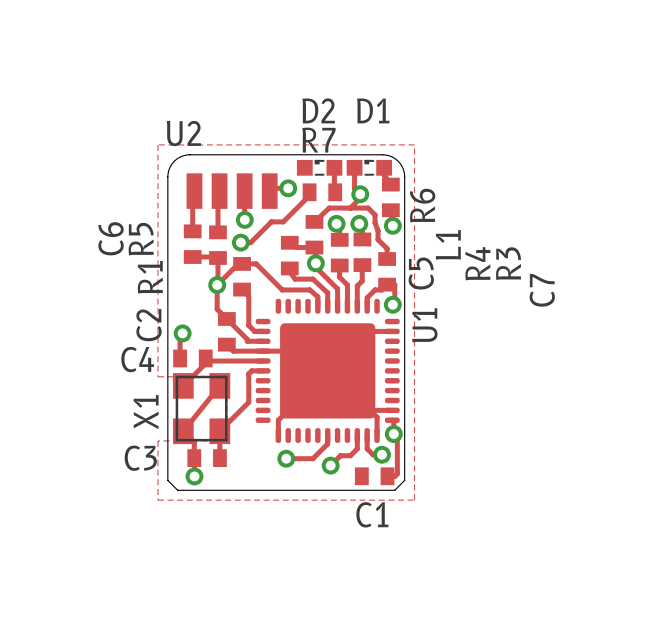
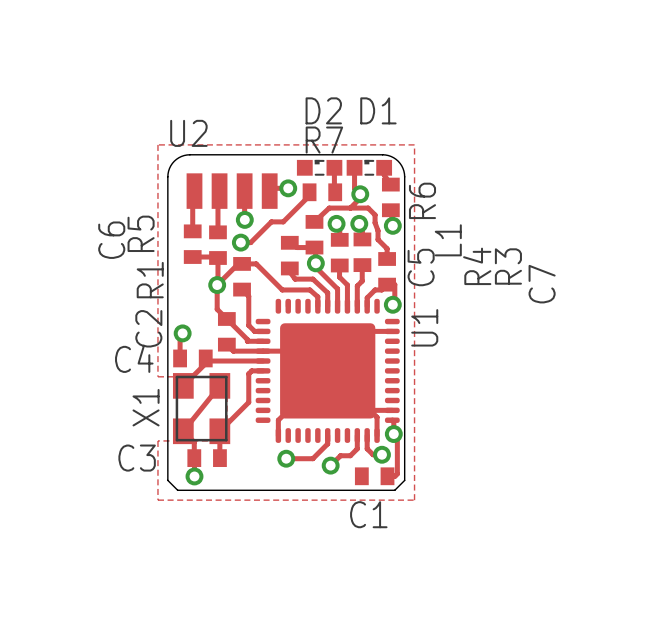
C6 name position: C6 (111, 238) -> C6 (111, 240)

